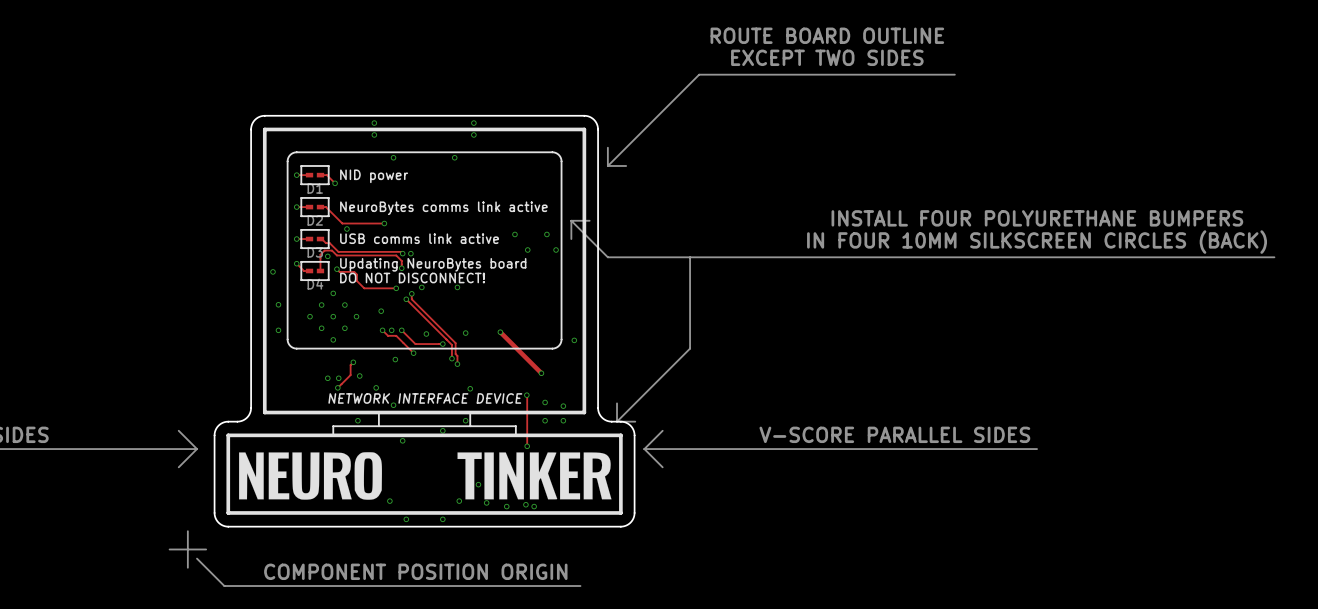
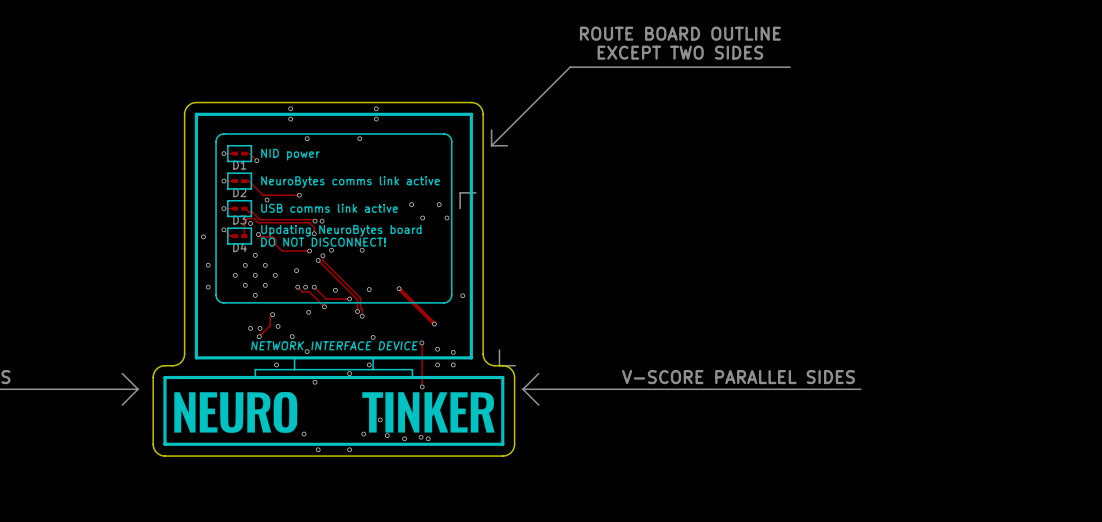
text: INSTALL FOUR POLYURETHANE BUMPERS (1037, 218) -> none
line: (571, 220) (607, 257) (1274, 257) -> none
text: IN FOUR 10MM SILKSCREEN CIRCLES (BACK) (1037, 242) -> none
line: (690, 257) (690, 348) (617, 421) -> none
line: (187, 531) (187, 567) -> none
line: (169, 549) (206, 549) -> none
line: (196, 558) (224, 586) (580, 586) -> none
text: COMPONENT POSITION ORIGIN (415, 571) -> none

